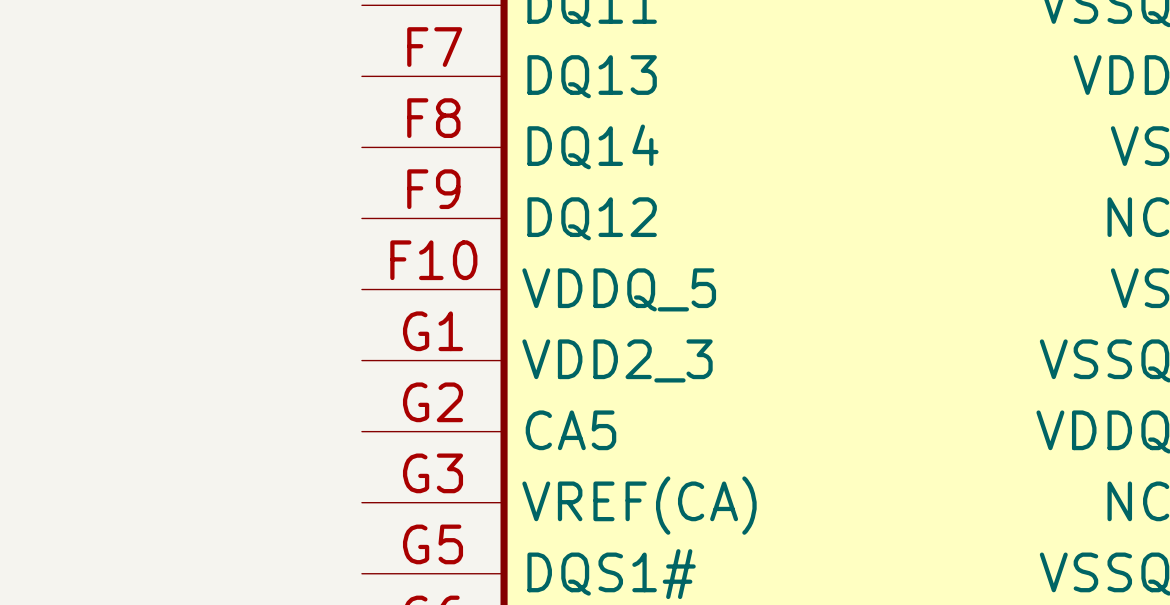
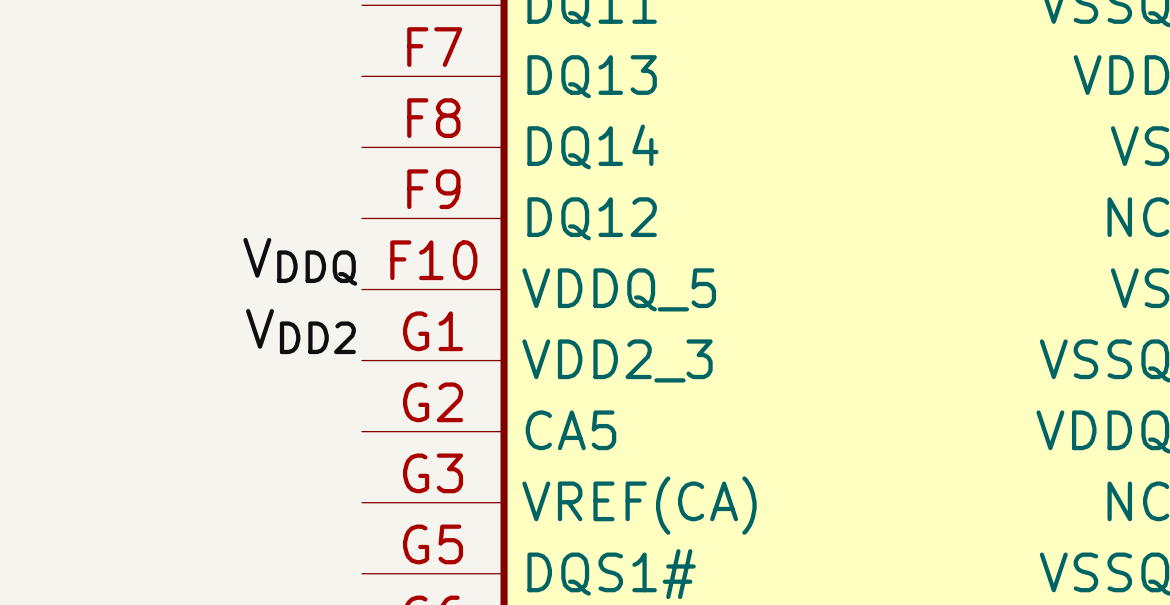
label: none -> VDDQ (300, 261)
label: none -> VDD2 (300, 331)

